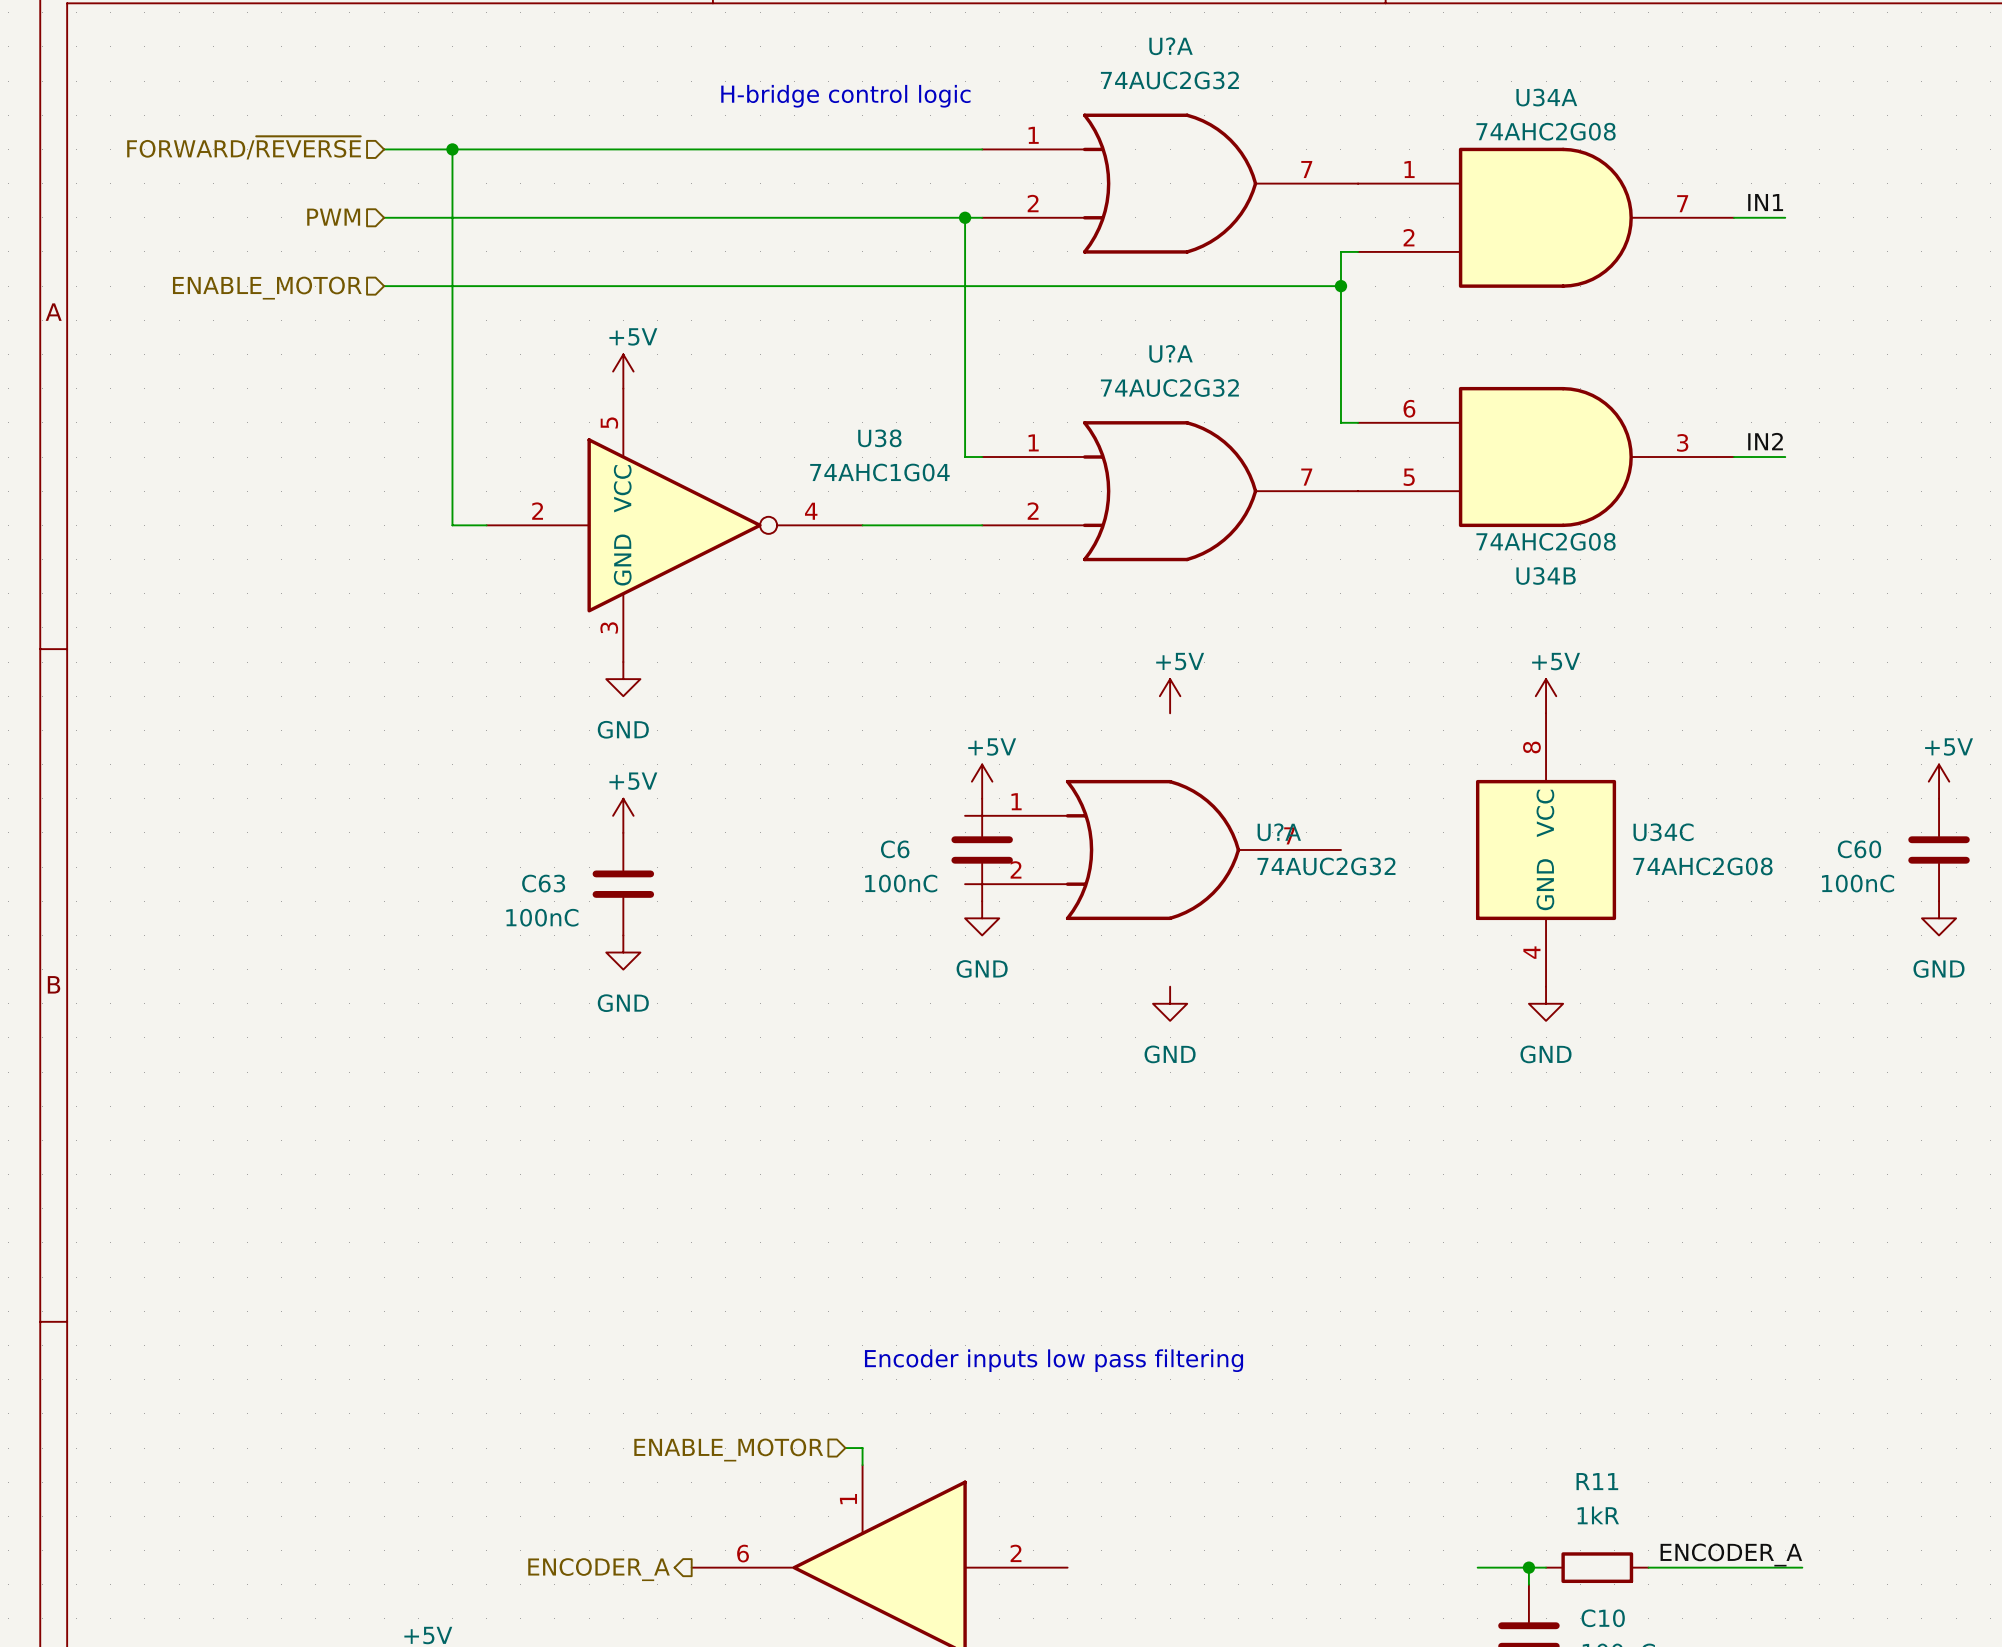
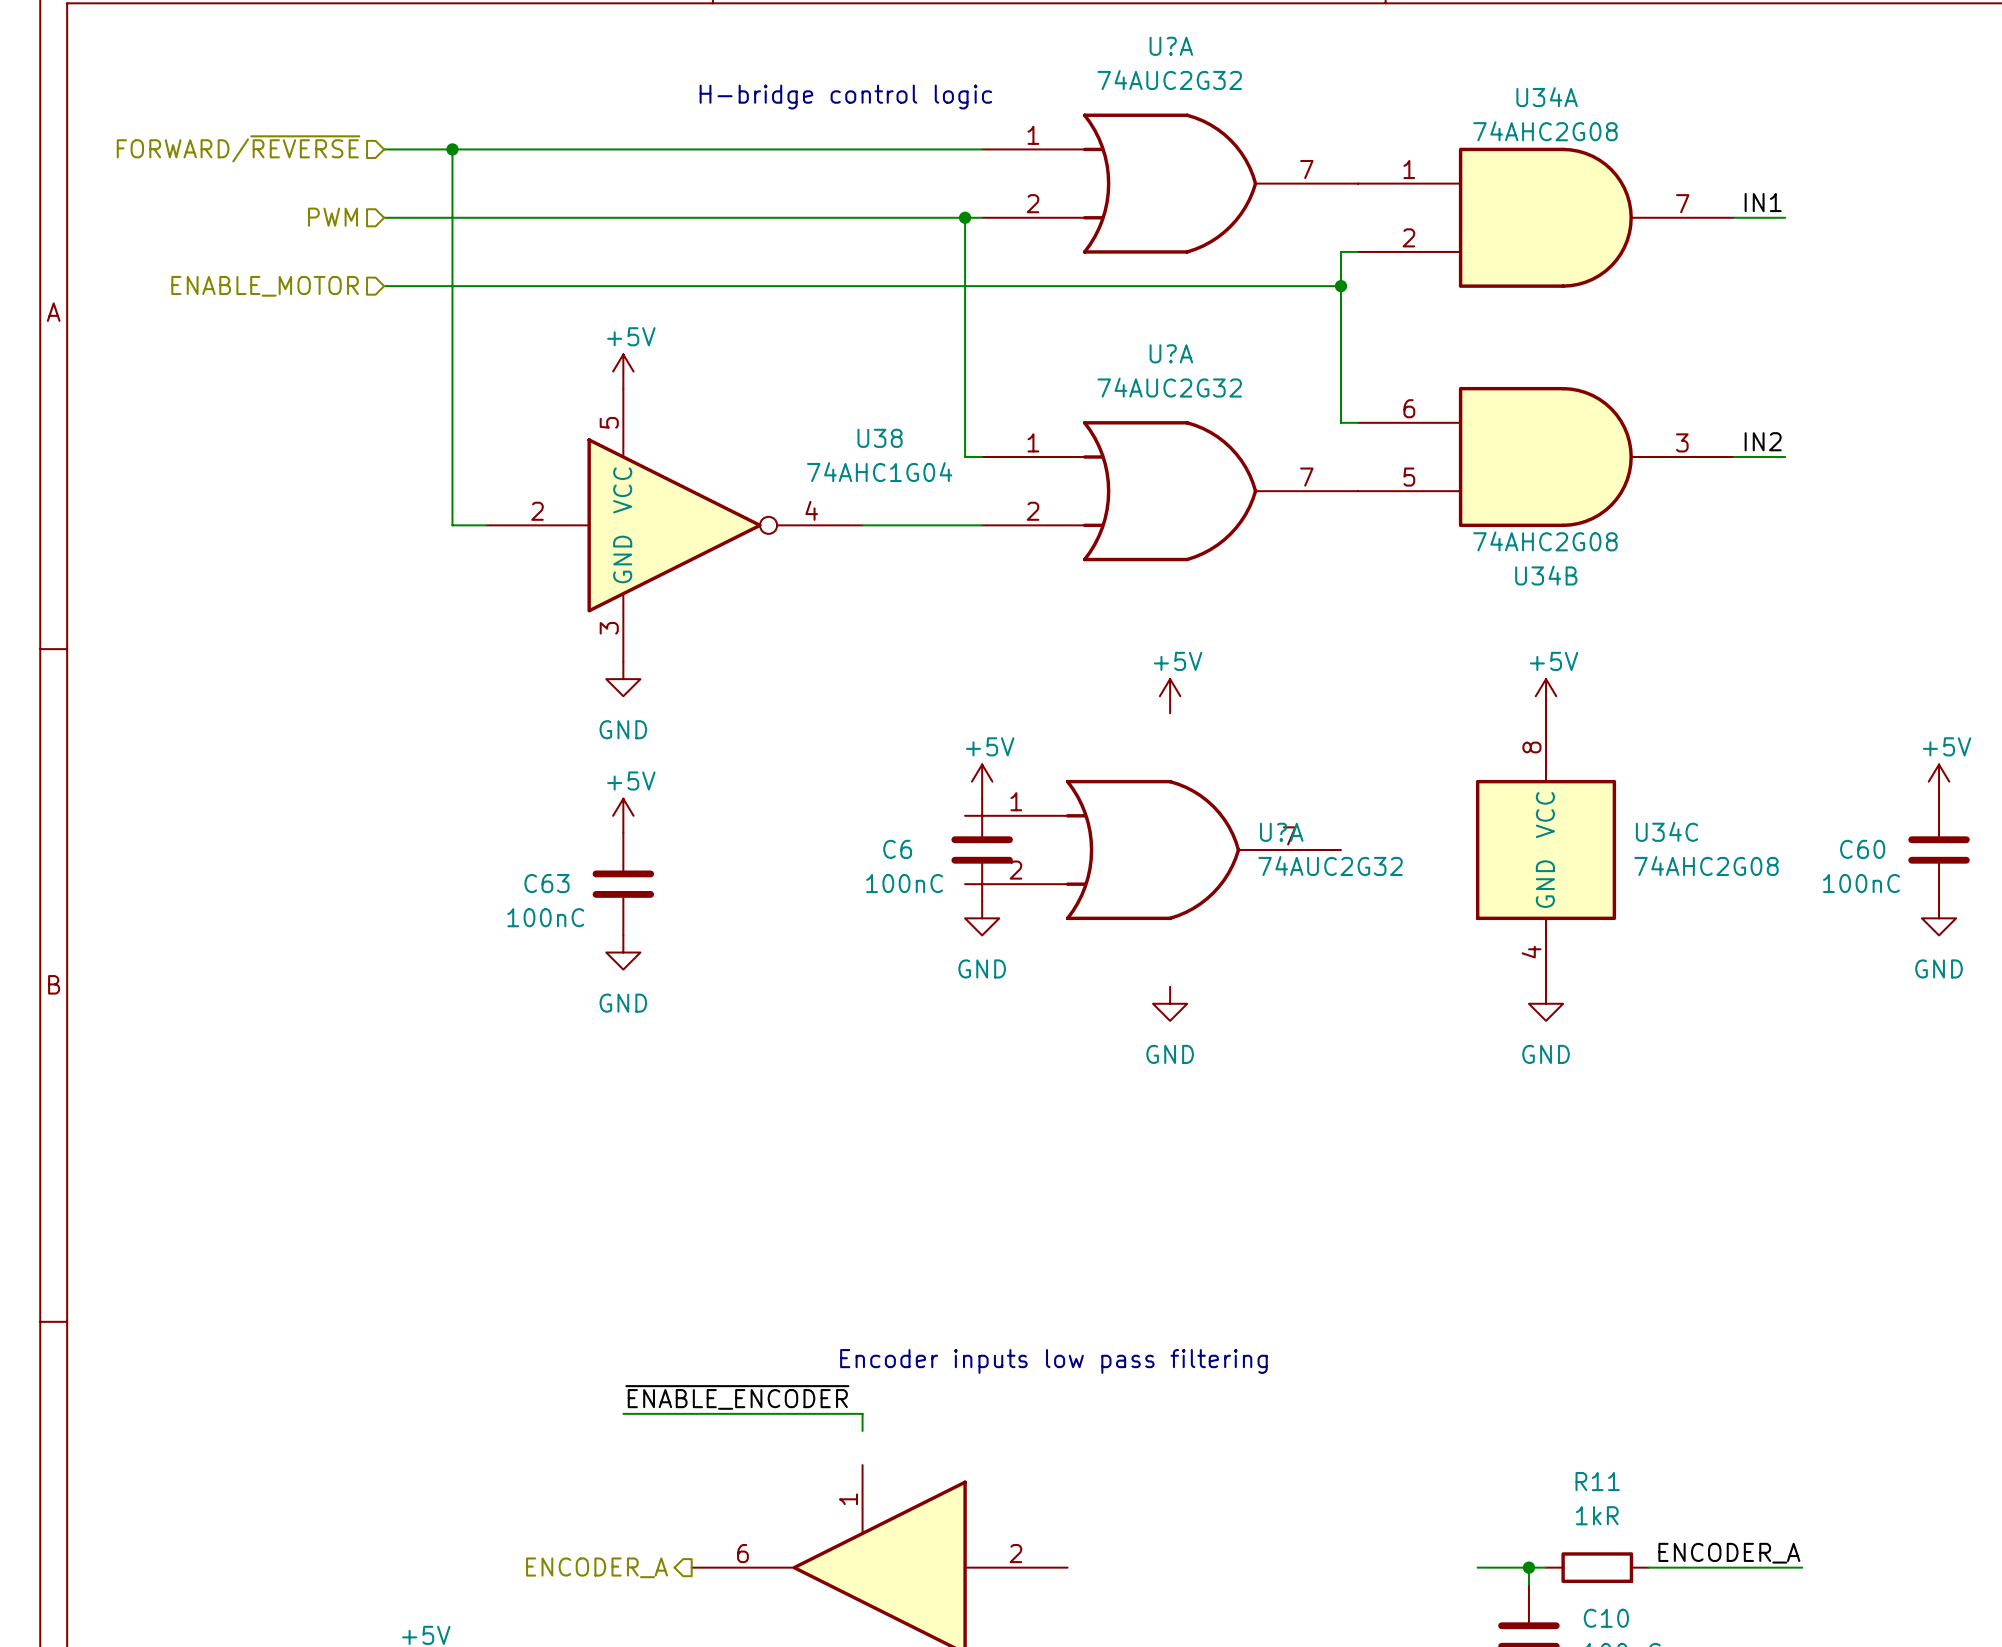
label: none -> ~{ENABLE_ENCODER} (737, 1397)
wire: none -> (623, 1413) (862, 1413) (862, 1430)
wire: (845, 1448) (862, 1448) (862, 1465) -> none
hierarchical label: ENABLE_MOTOR (728, 1450) -> none

